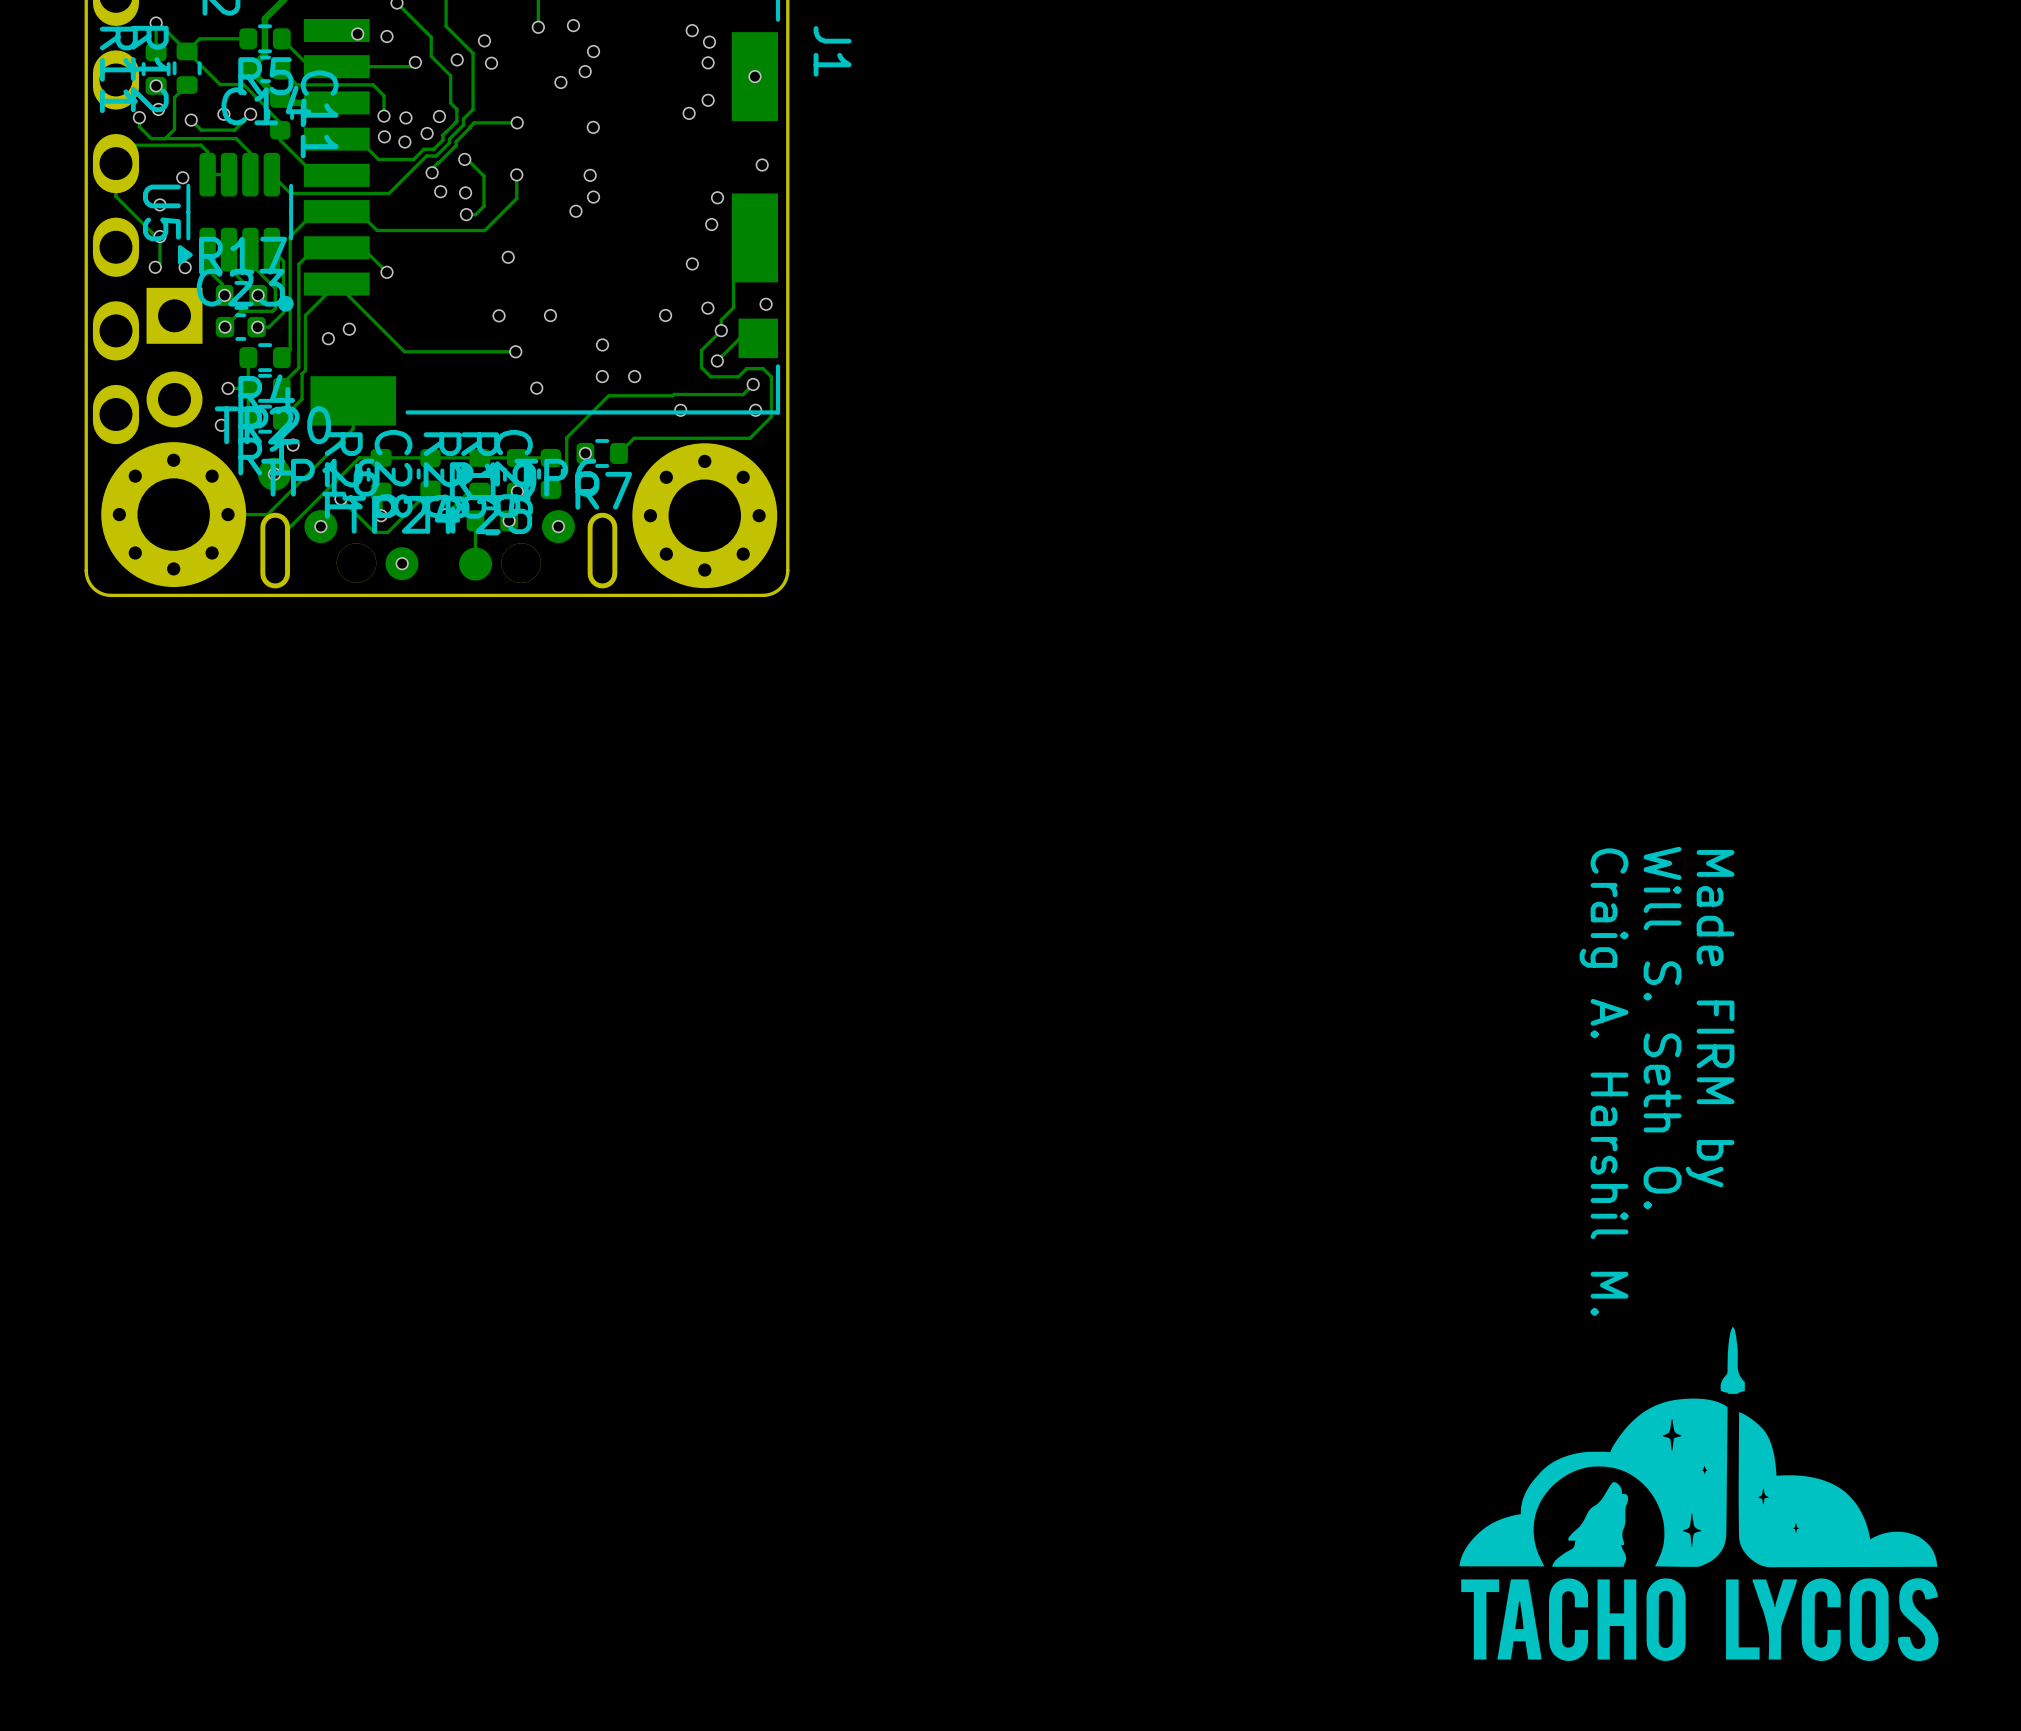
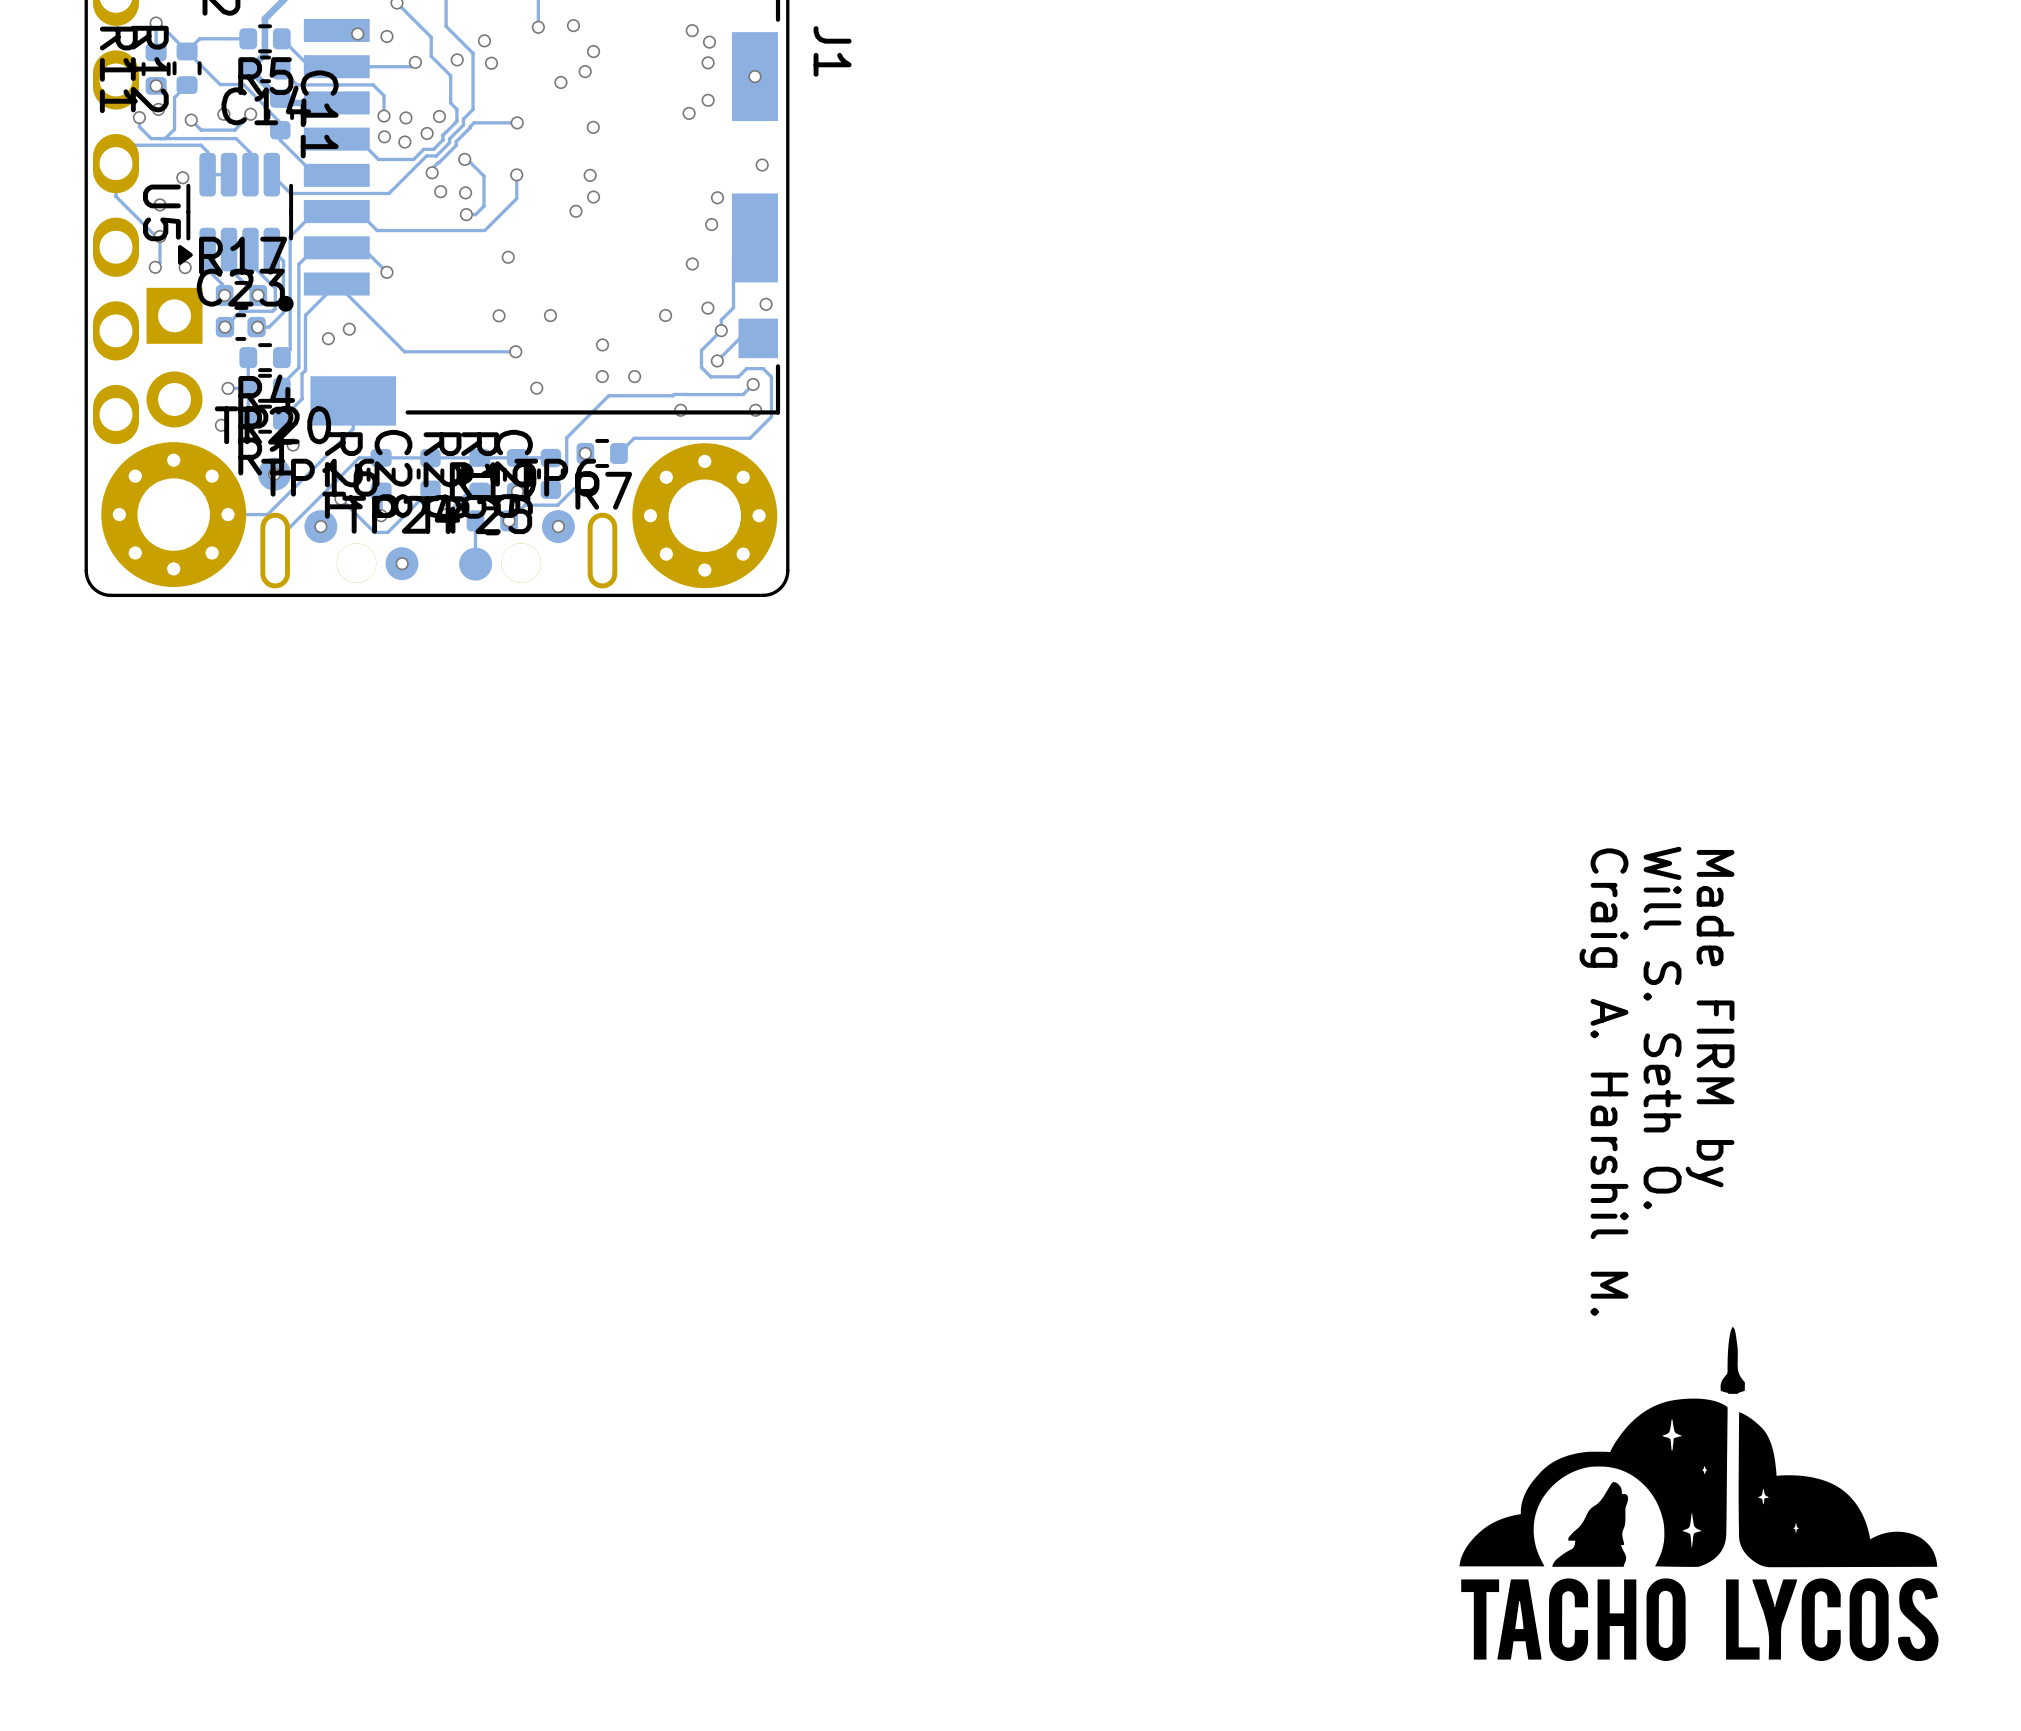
track: none -> (574, 488) (557, 505) (524, 505) (509, 520)

